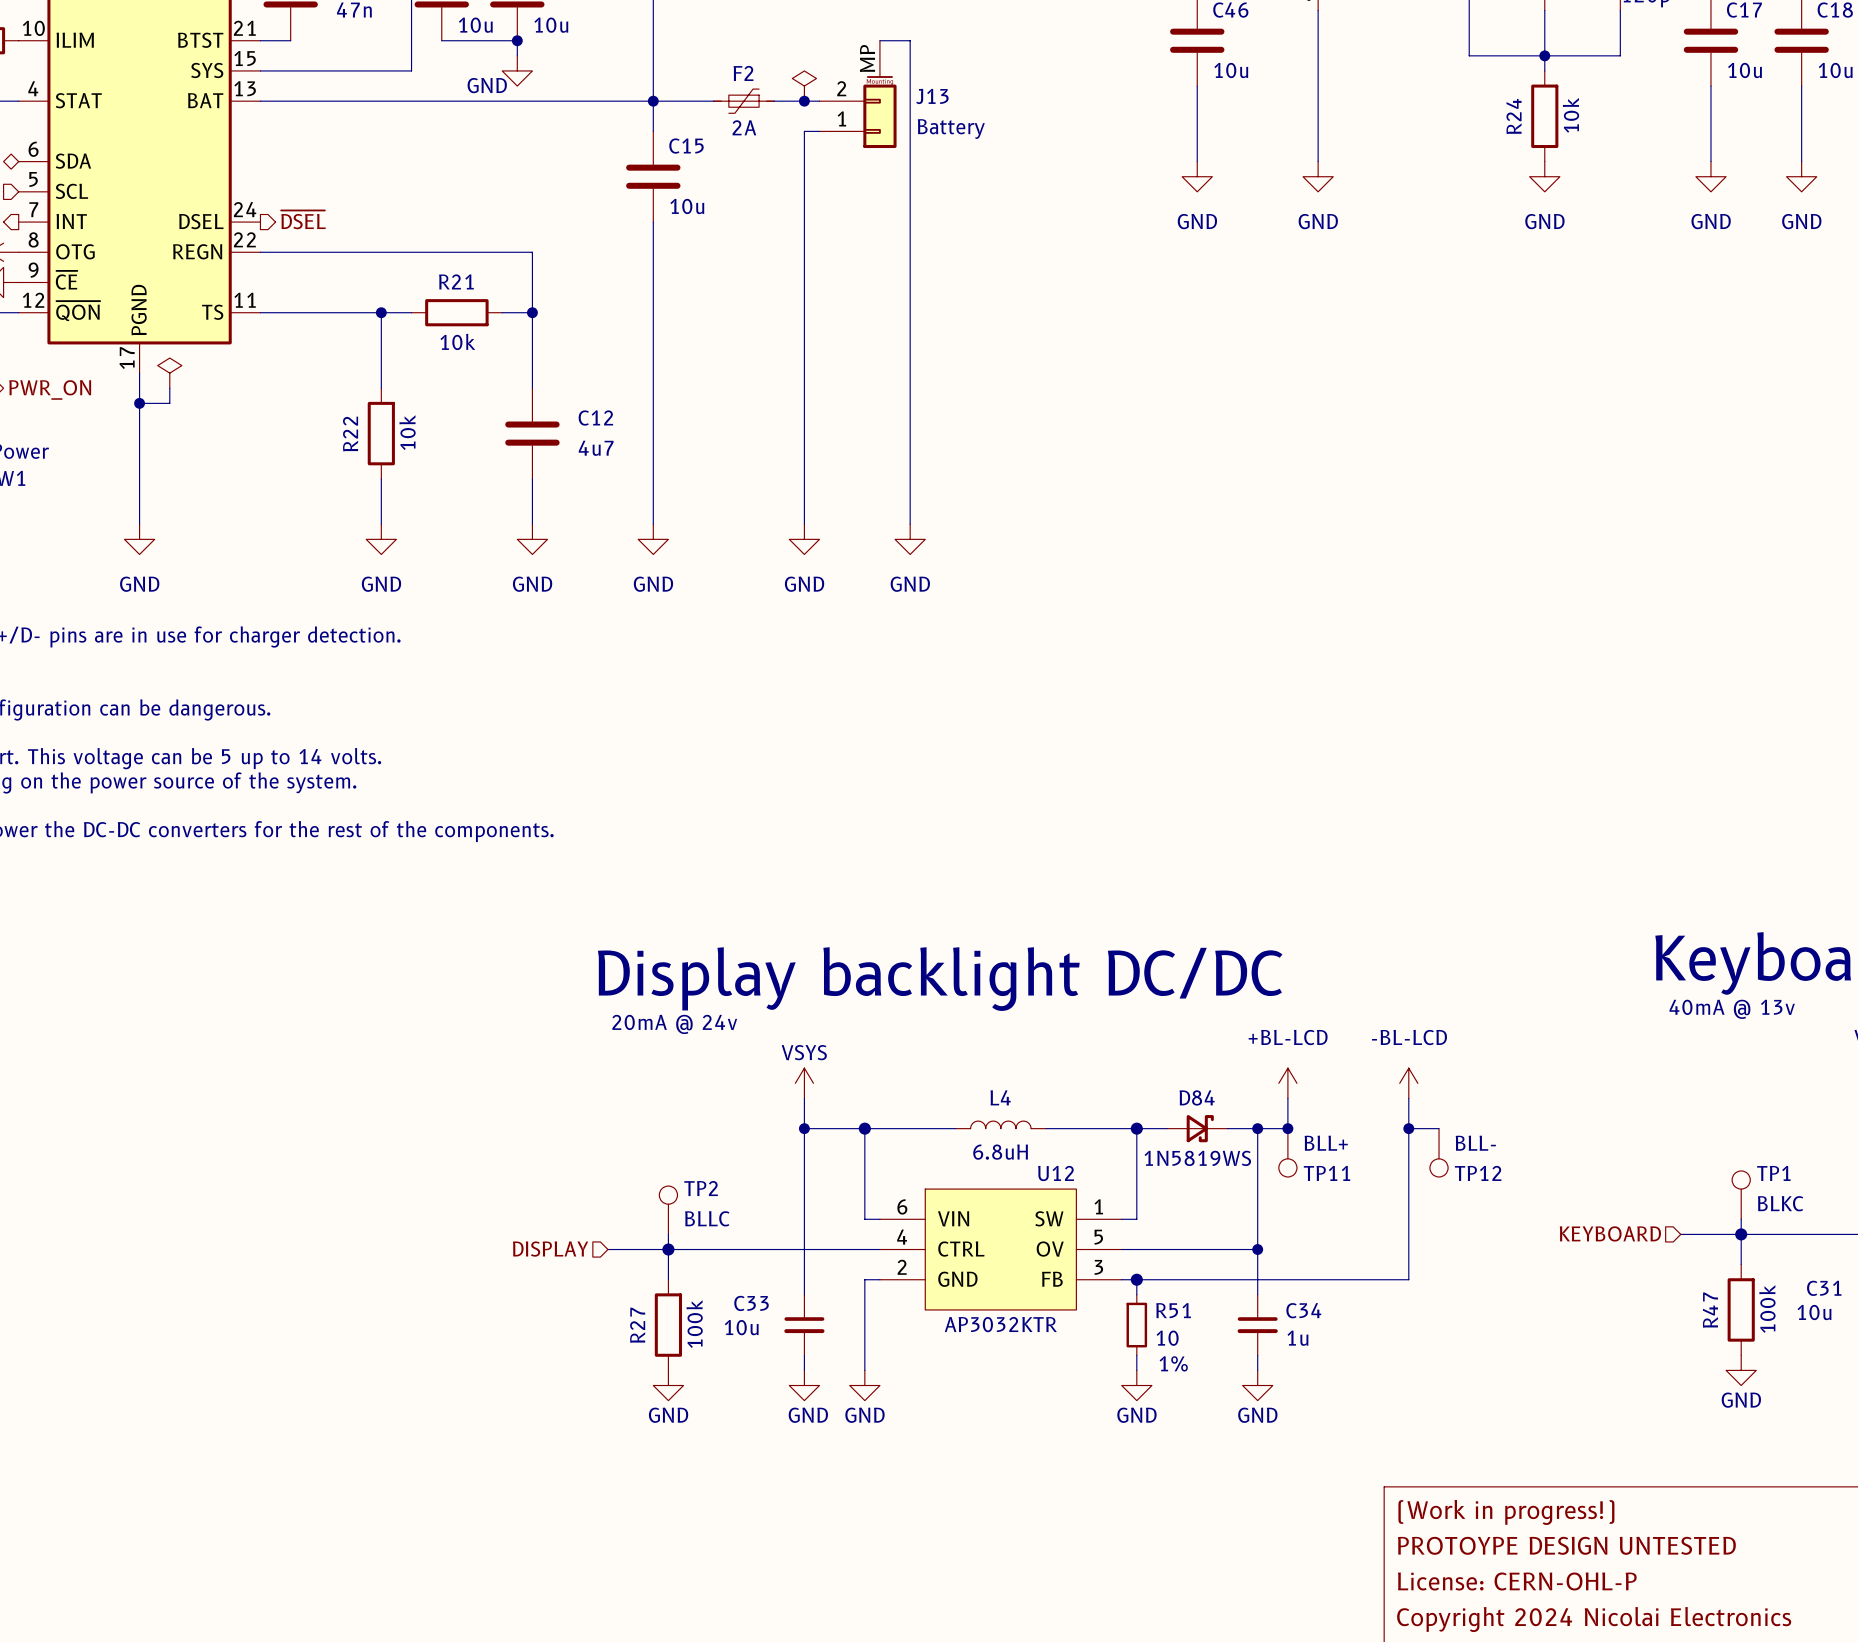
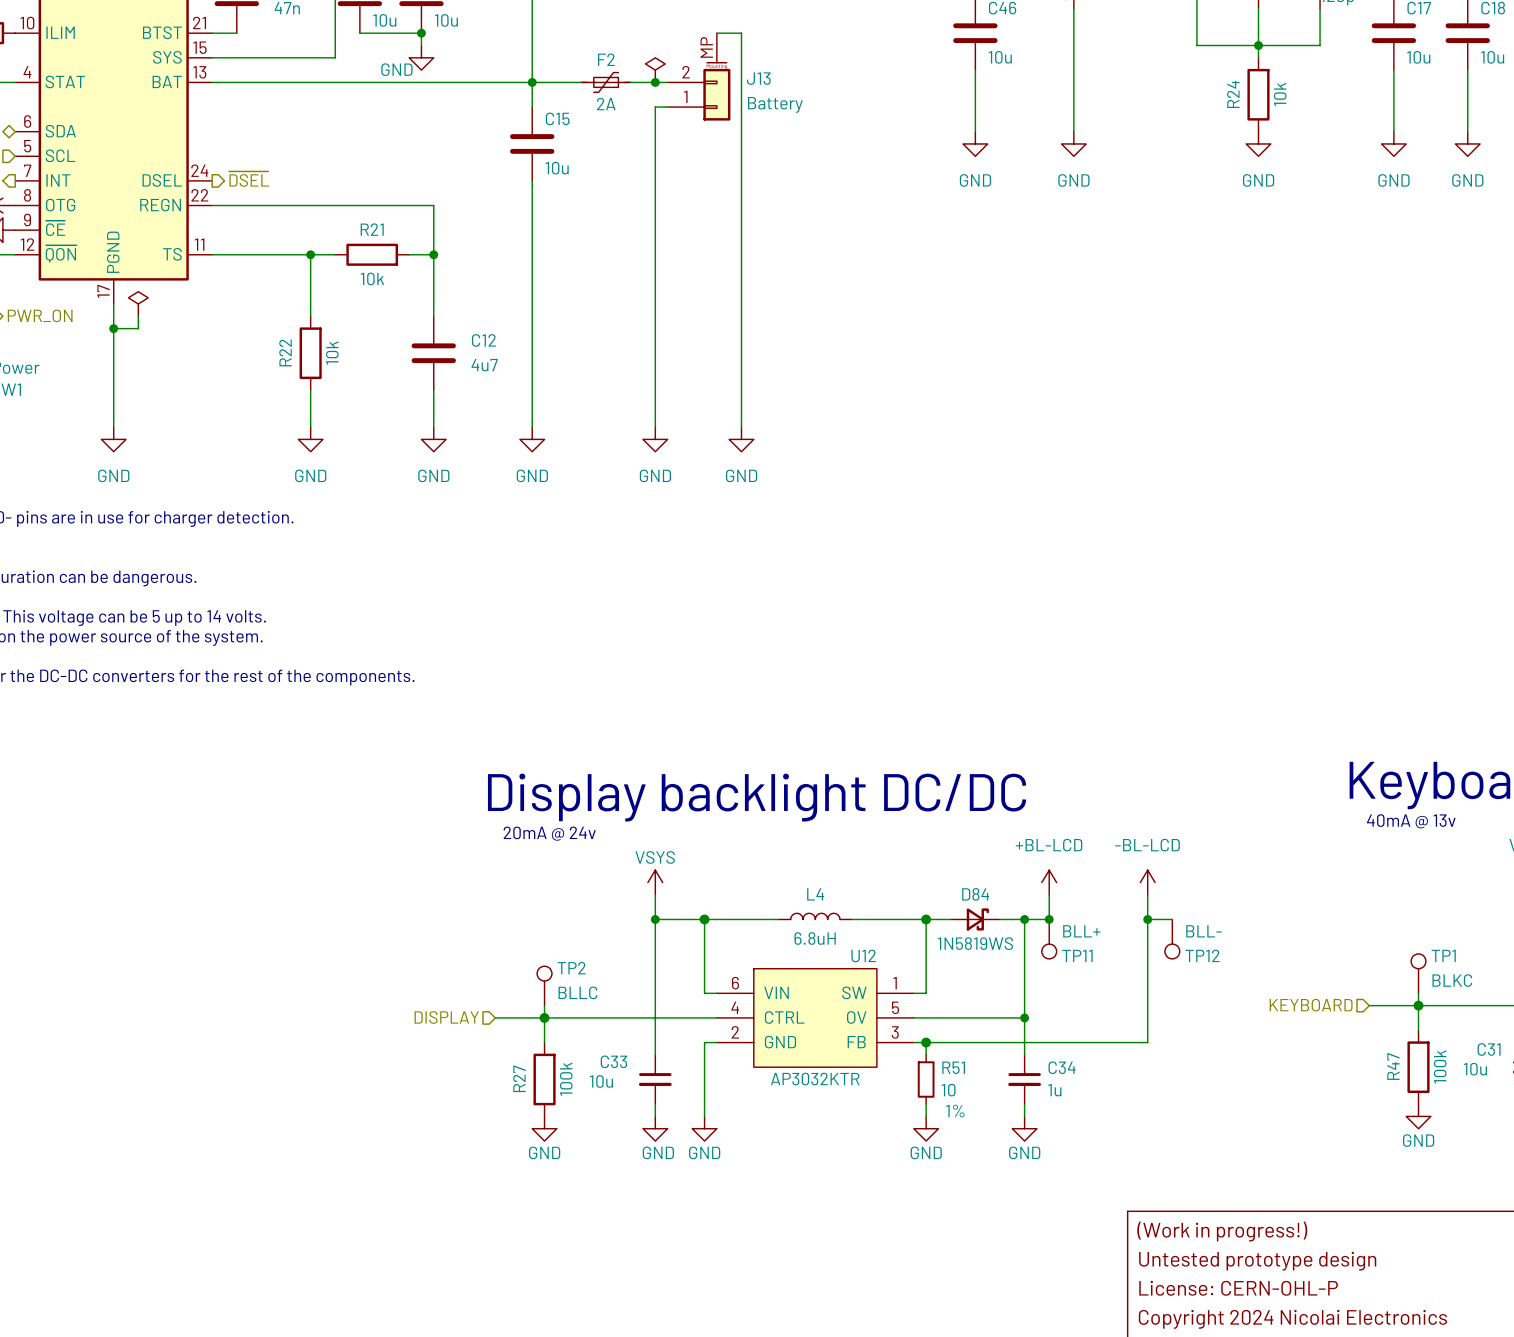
title block: PROTOYPE DESIGN UNTESTED (1566, 1545) -> Untested prototype design (1257, 1261)

